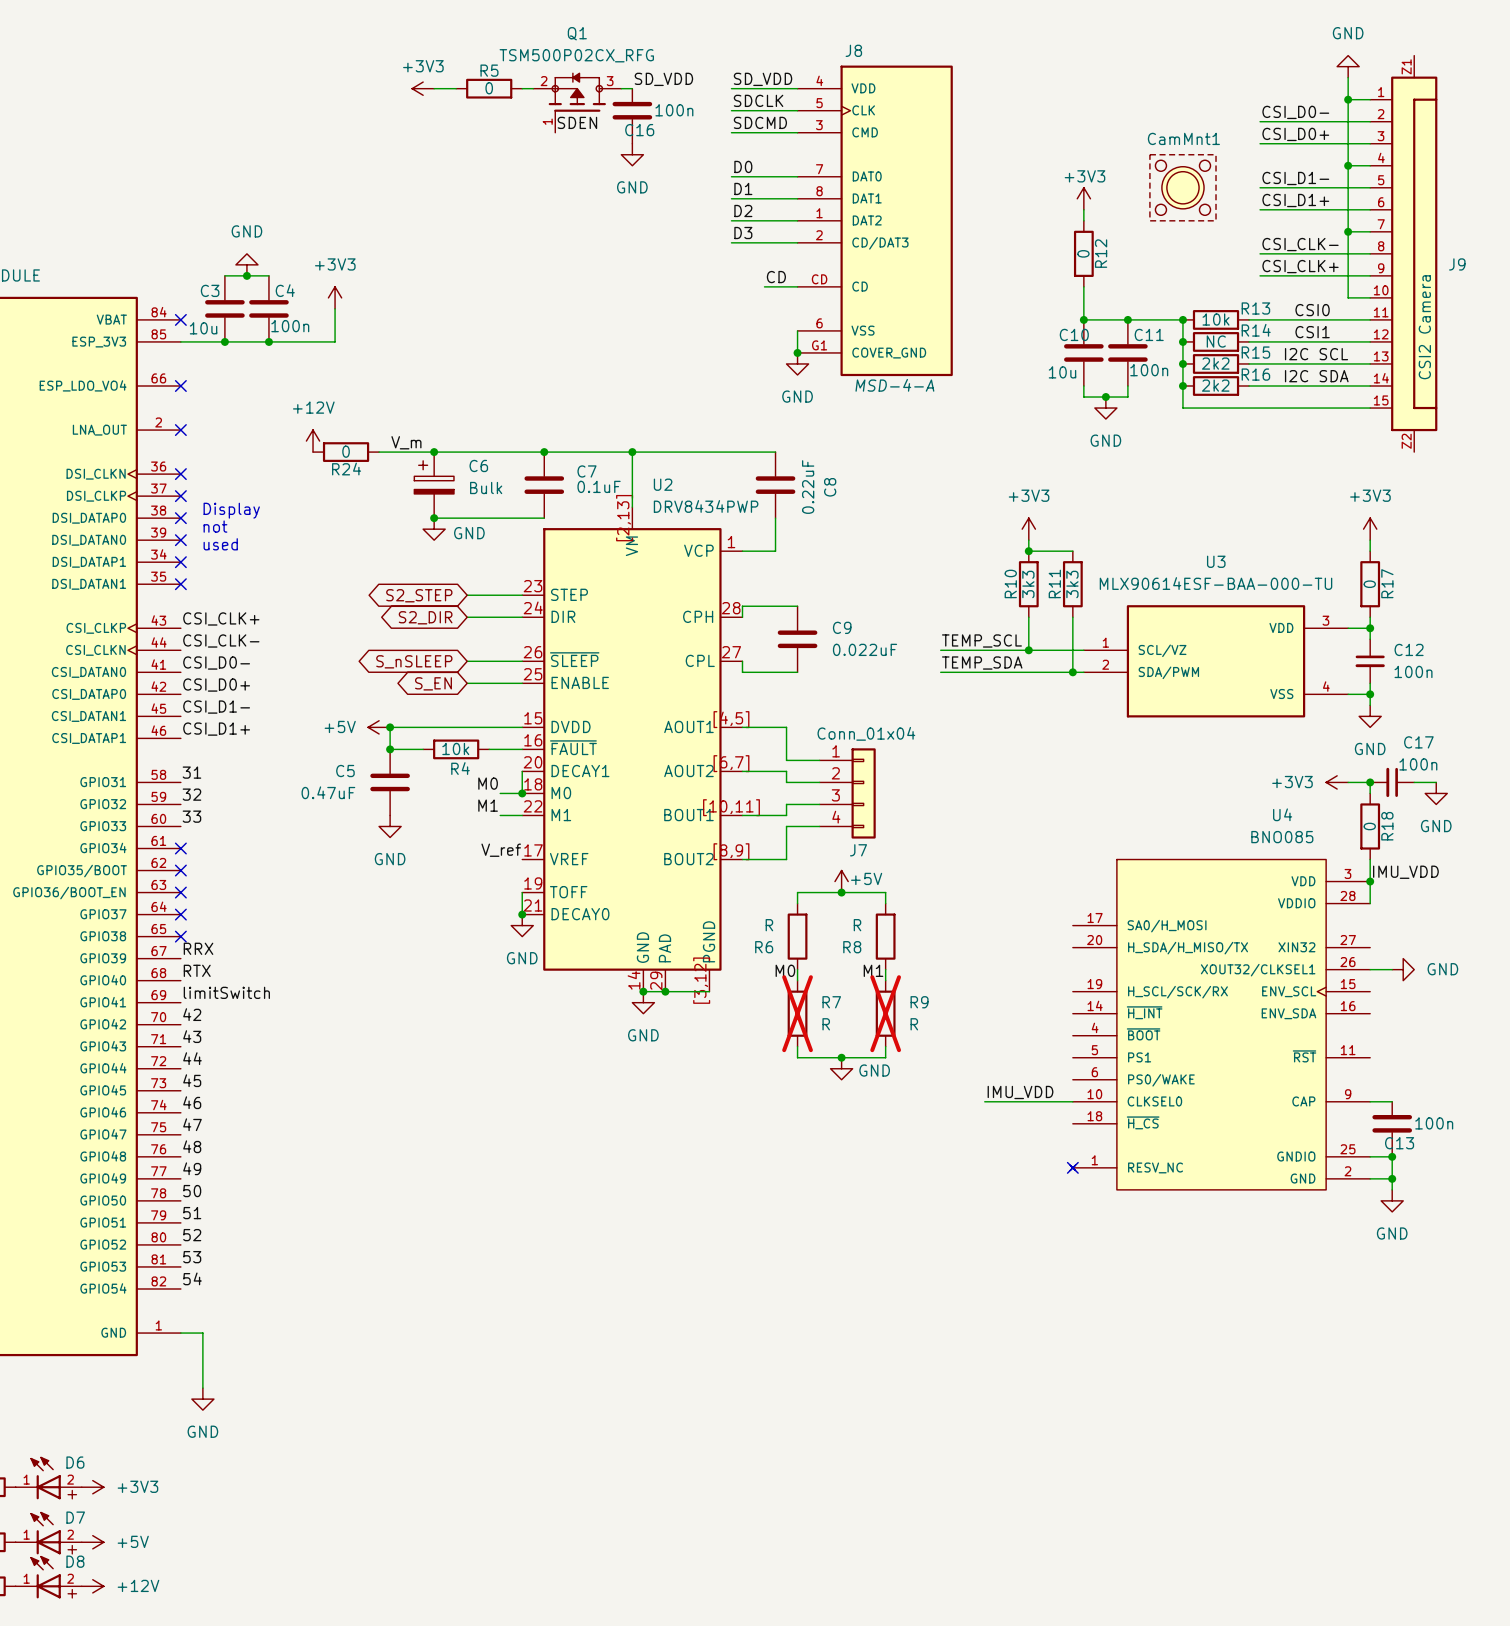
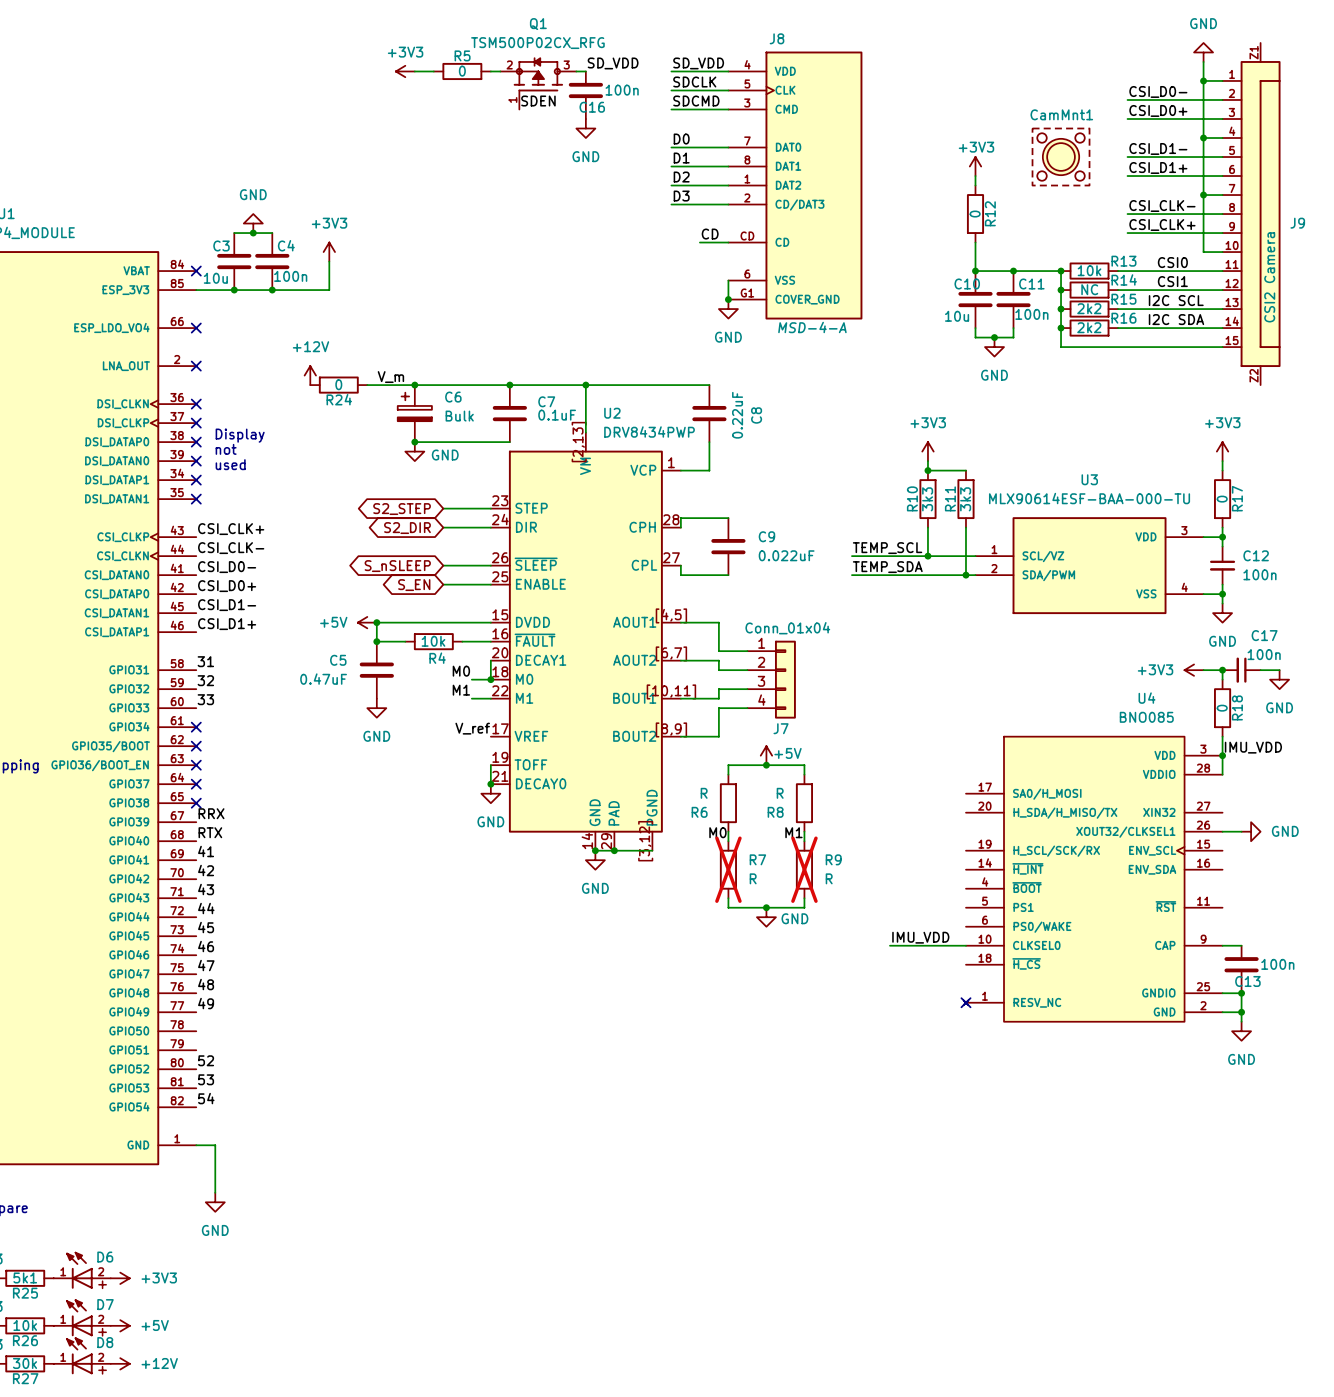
label: limitSwitch (226, 992) -> 41 (206, 851)
label: 50 (192, 1191) -> none
label: 51 (192, 1213) -> none

